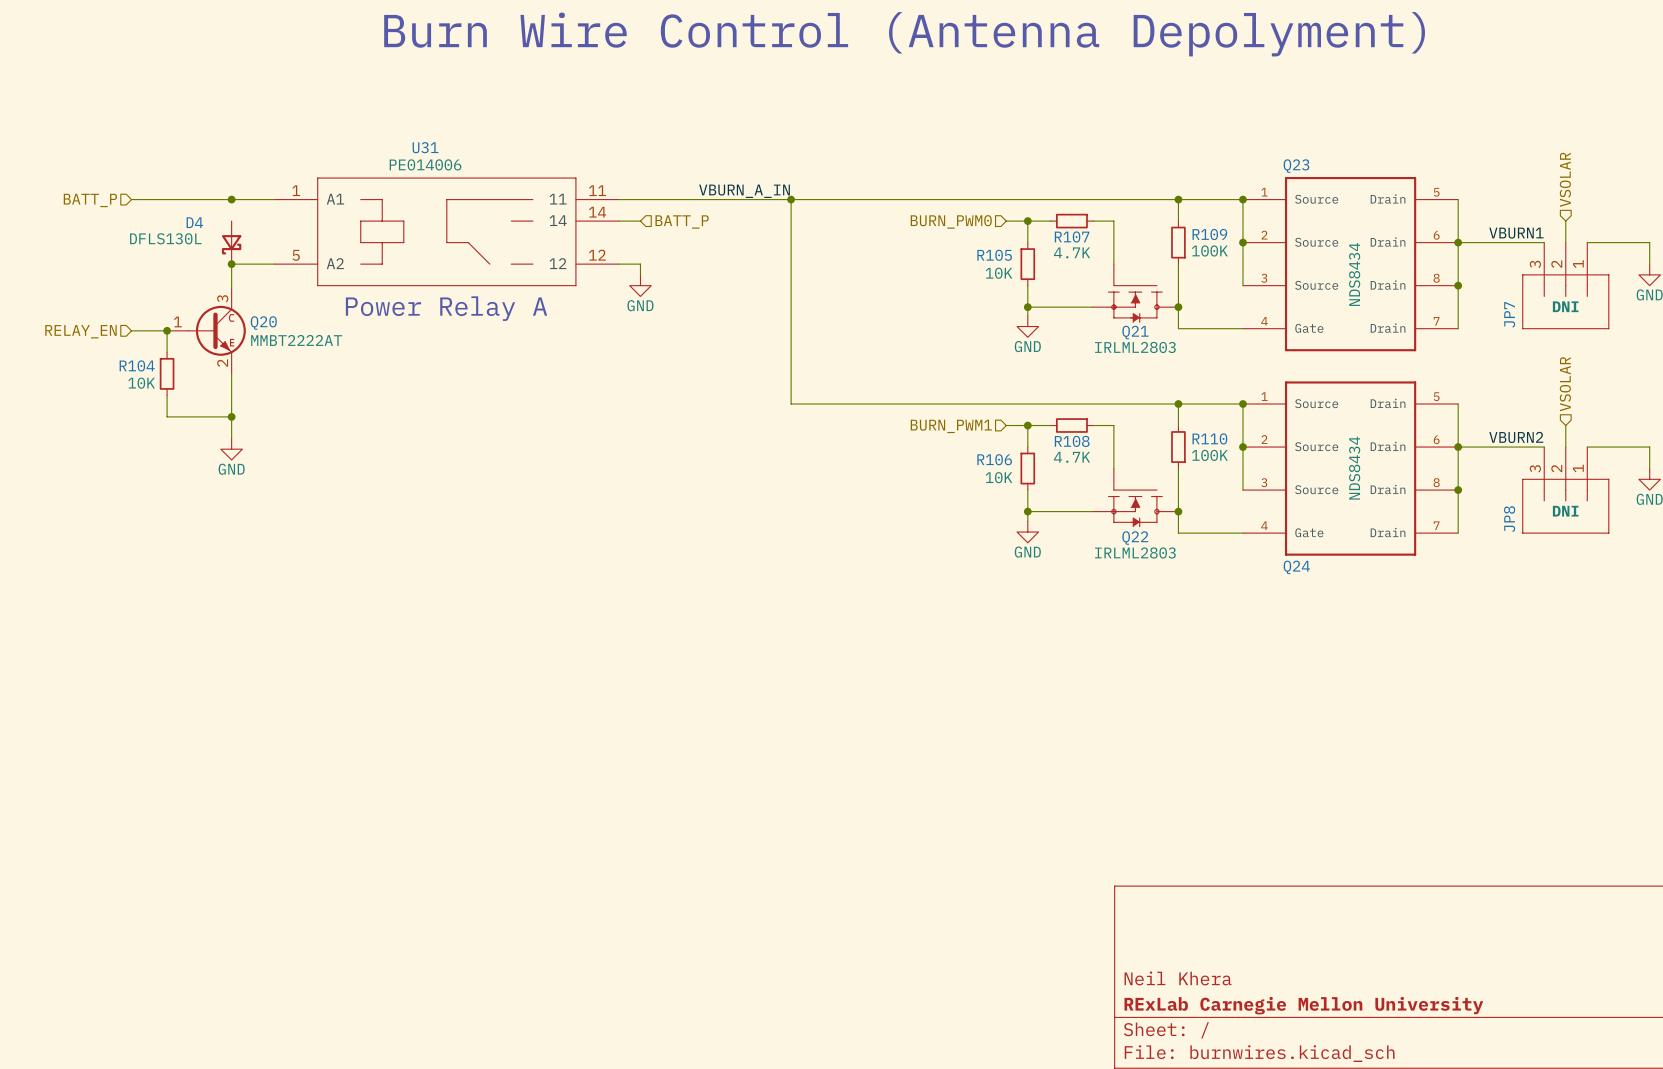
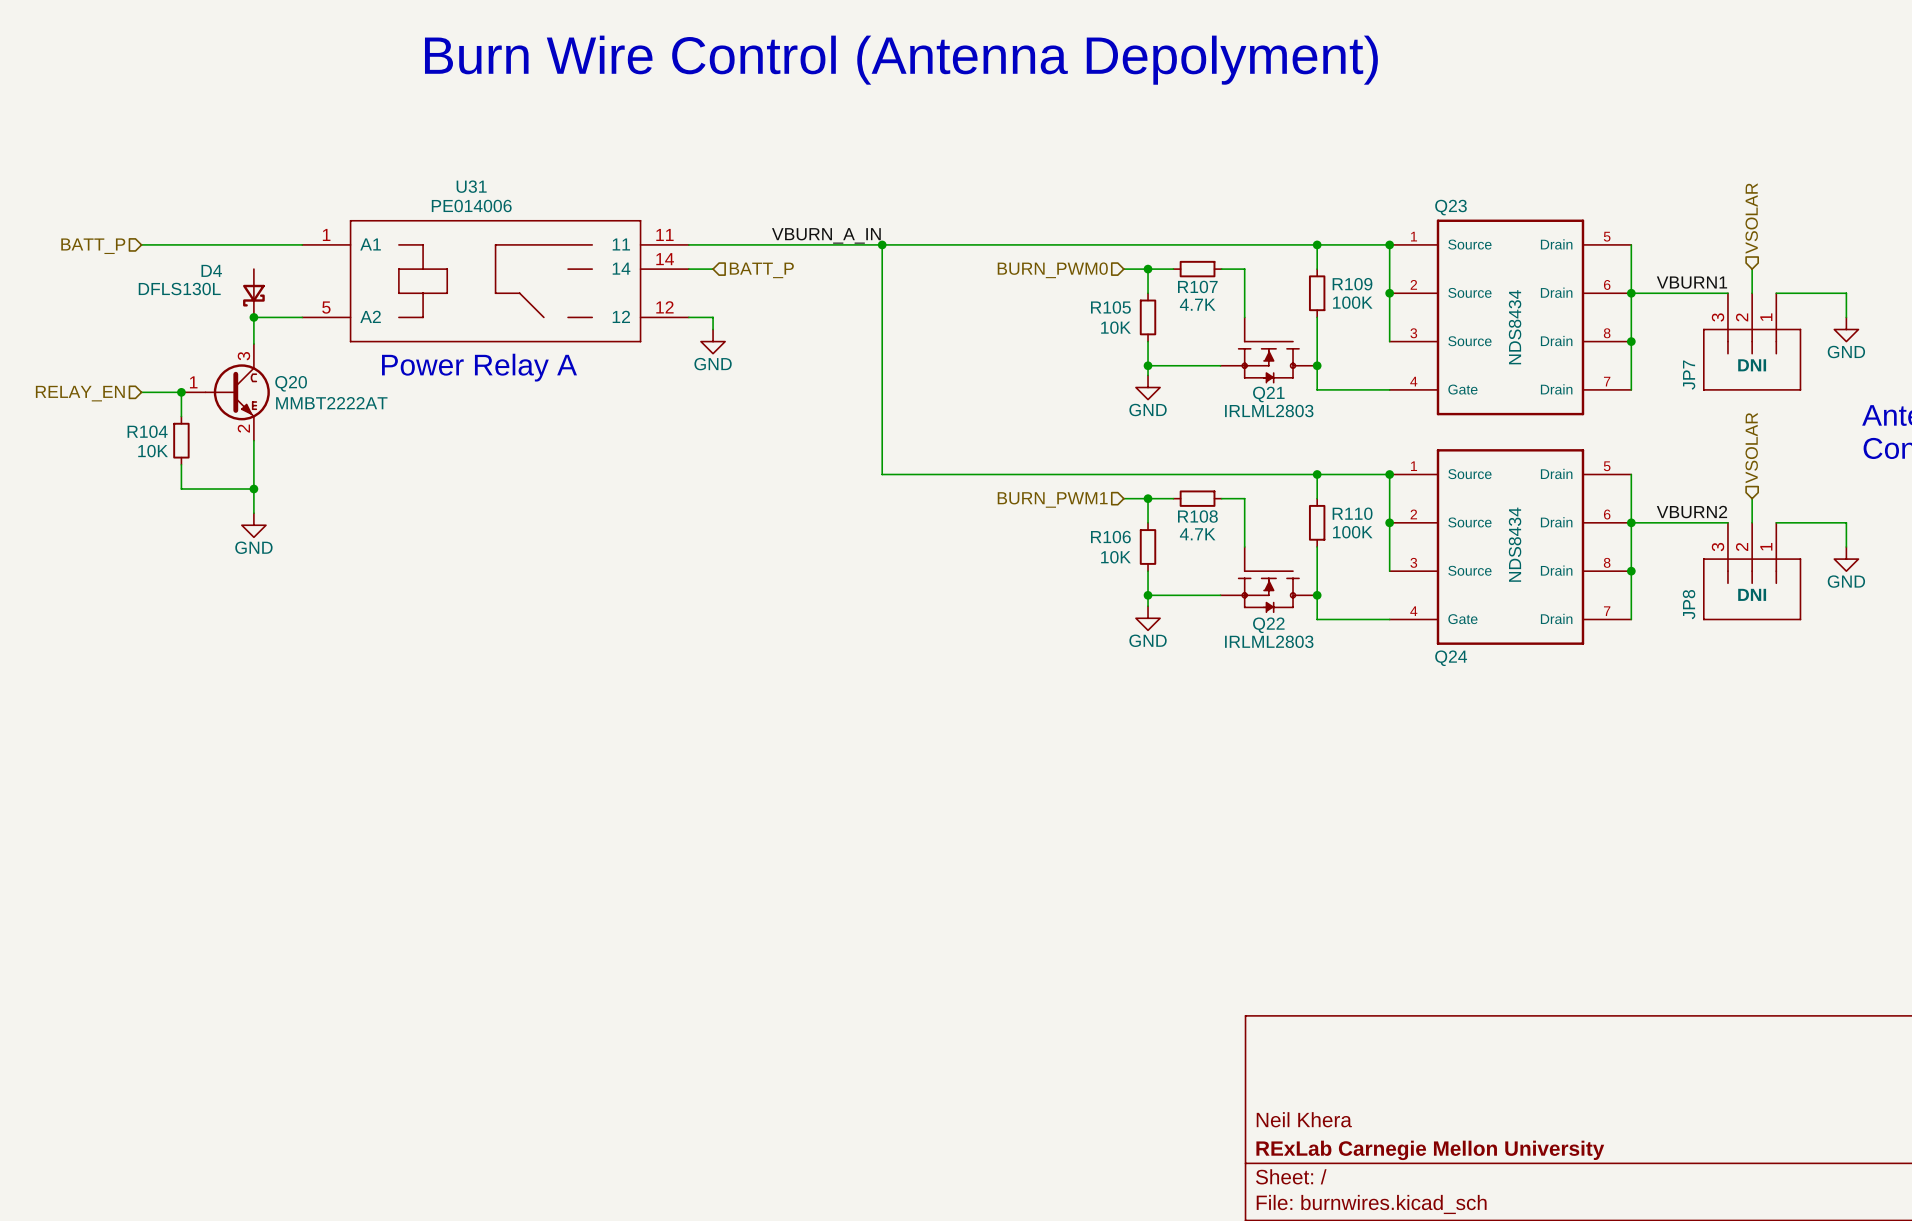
junction: (231, 199) -> none

